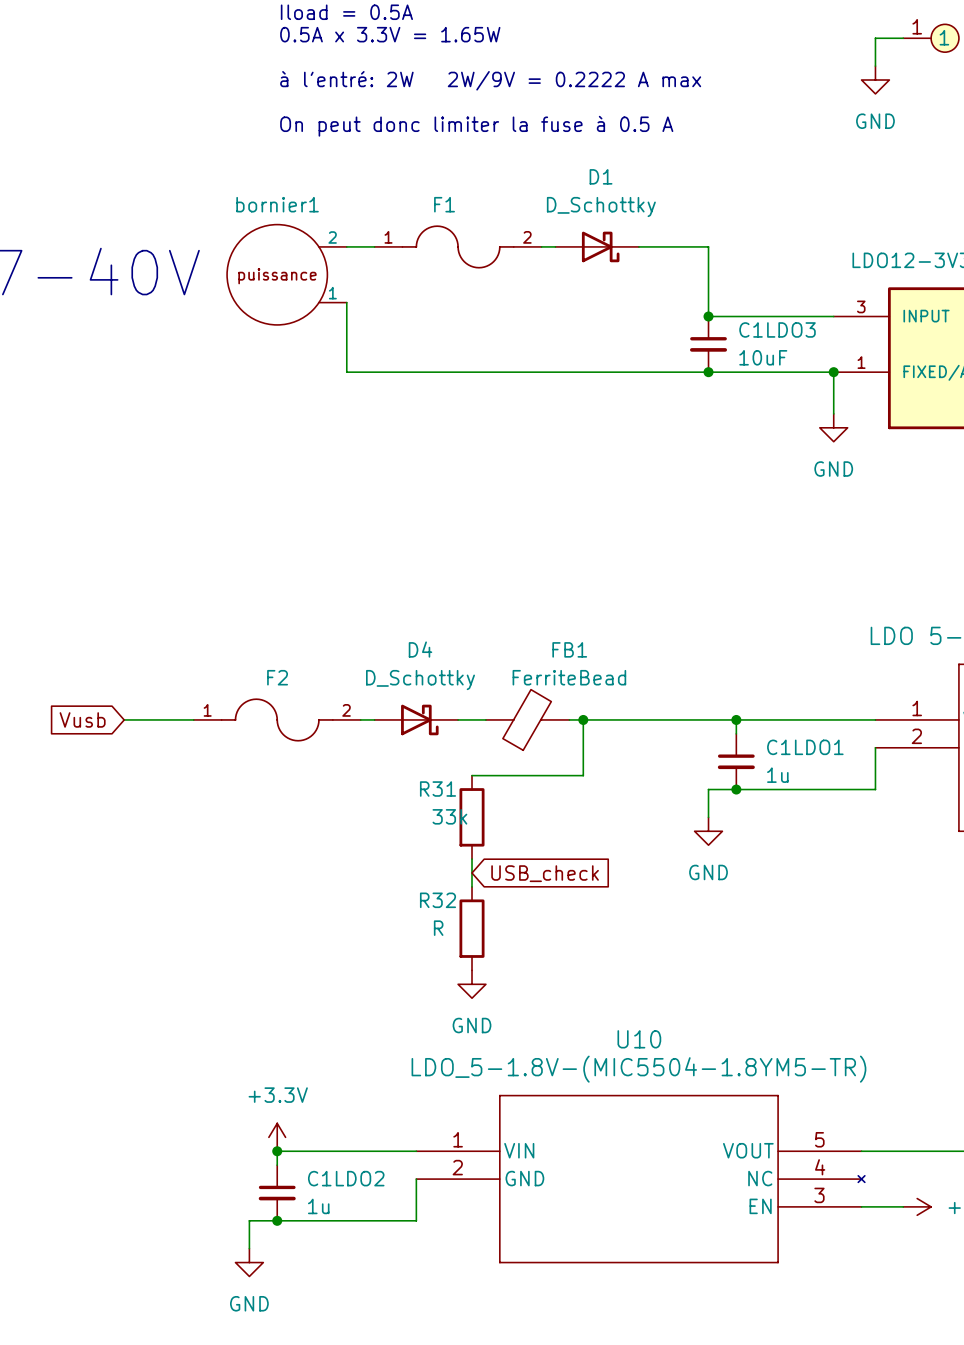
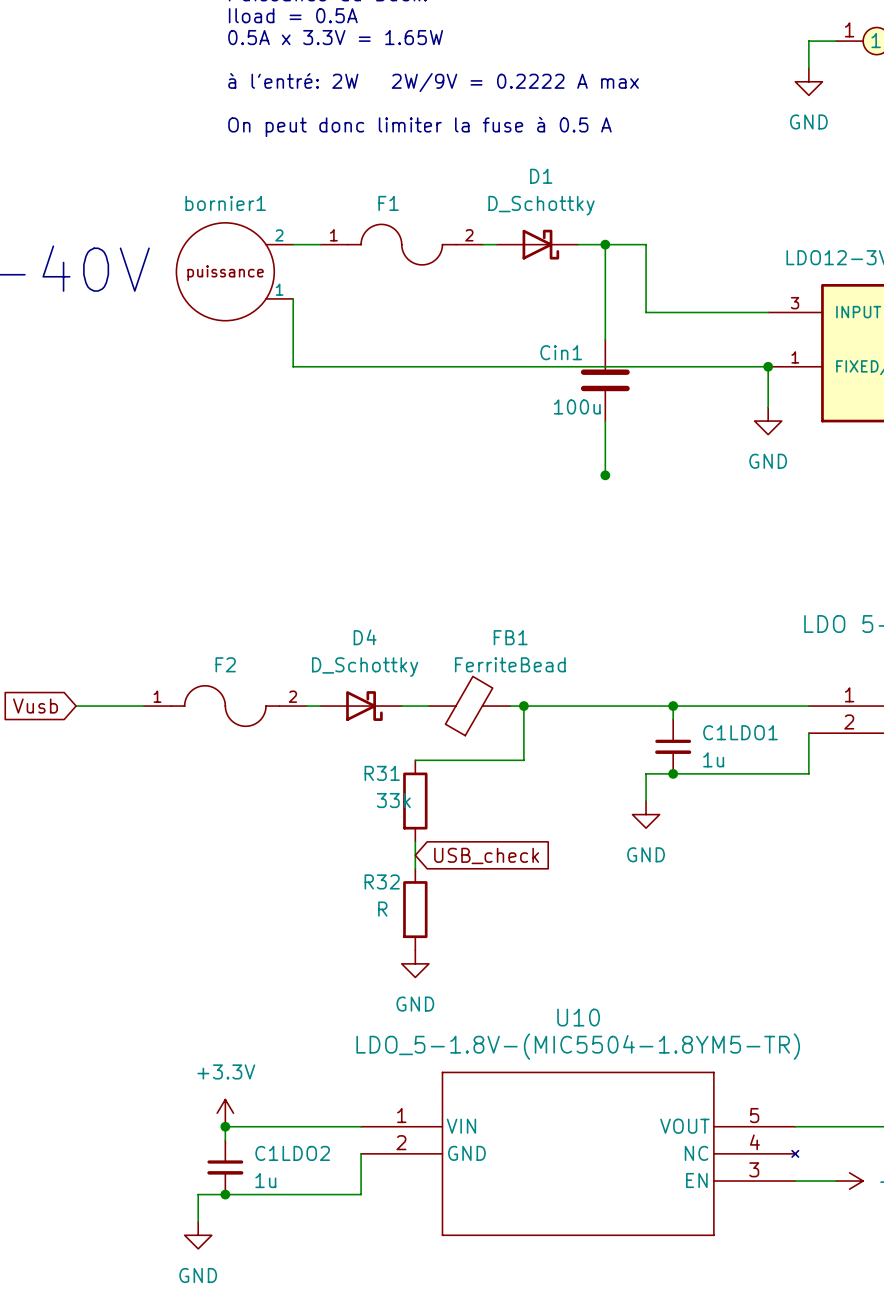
wire: none -> (605, 244) (605, 339)
junction: none -> (605, 244)
junction: (708, 316) -> none
C1LDO3: 10uF (708, 344) -> none
junction: (708, 372) -> none
Cin1: none -> 100u (605, 380)
wire: none -> (605, 421) (605, 475)
junction: none -> (605, 475)

